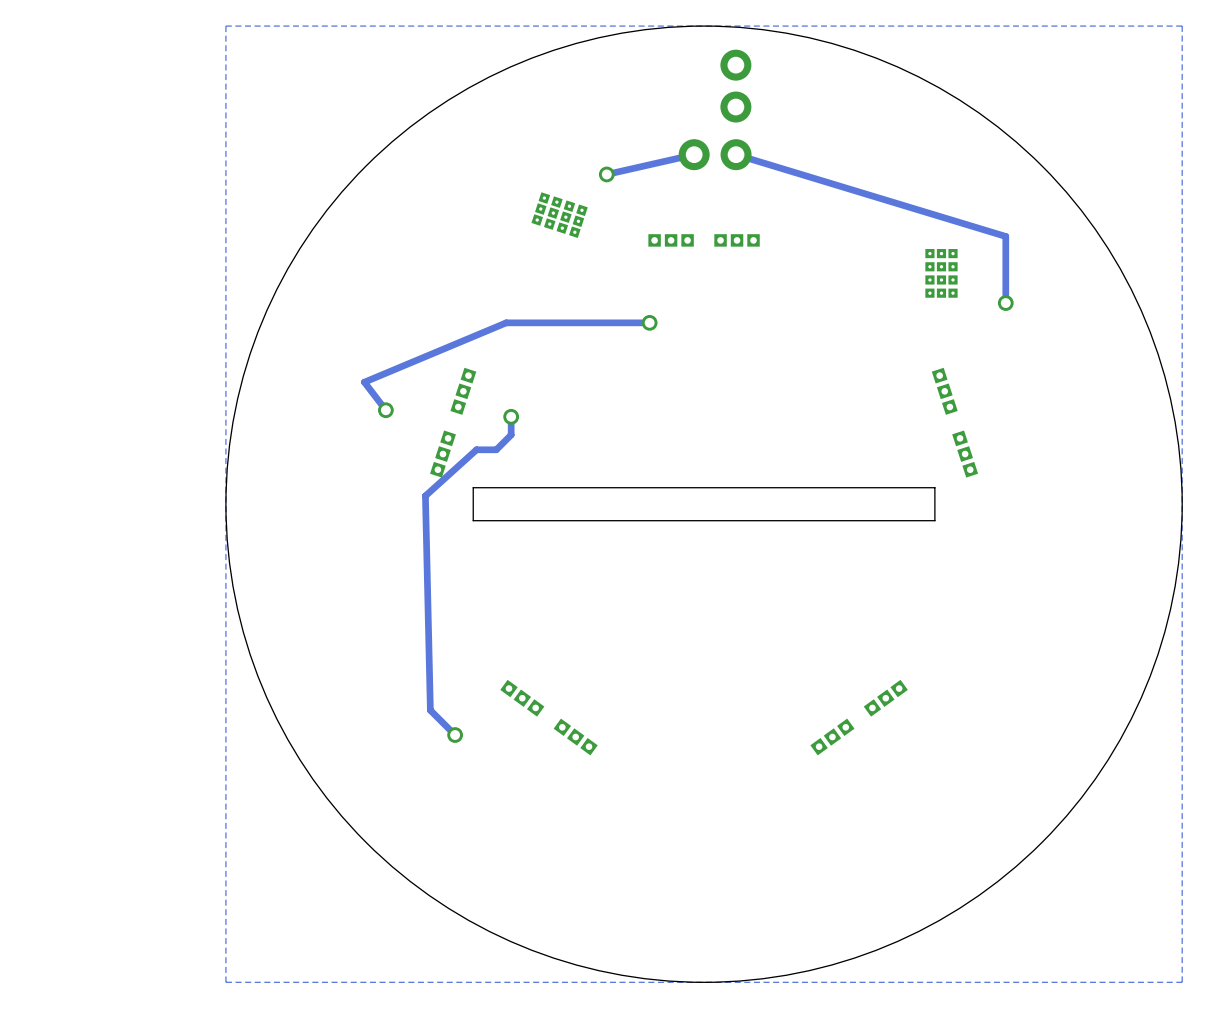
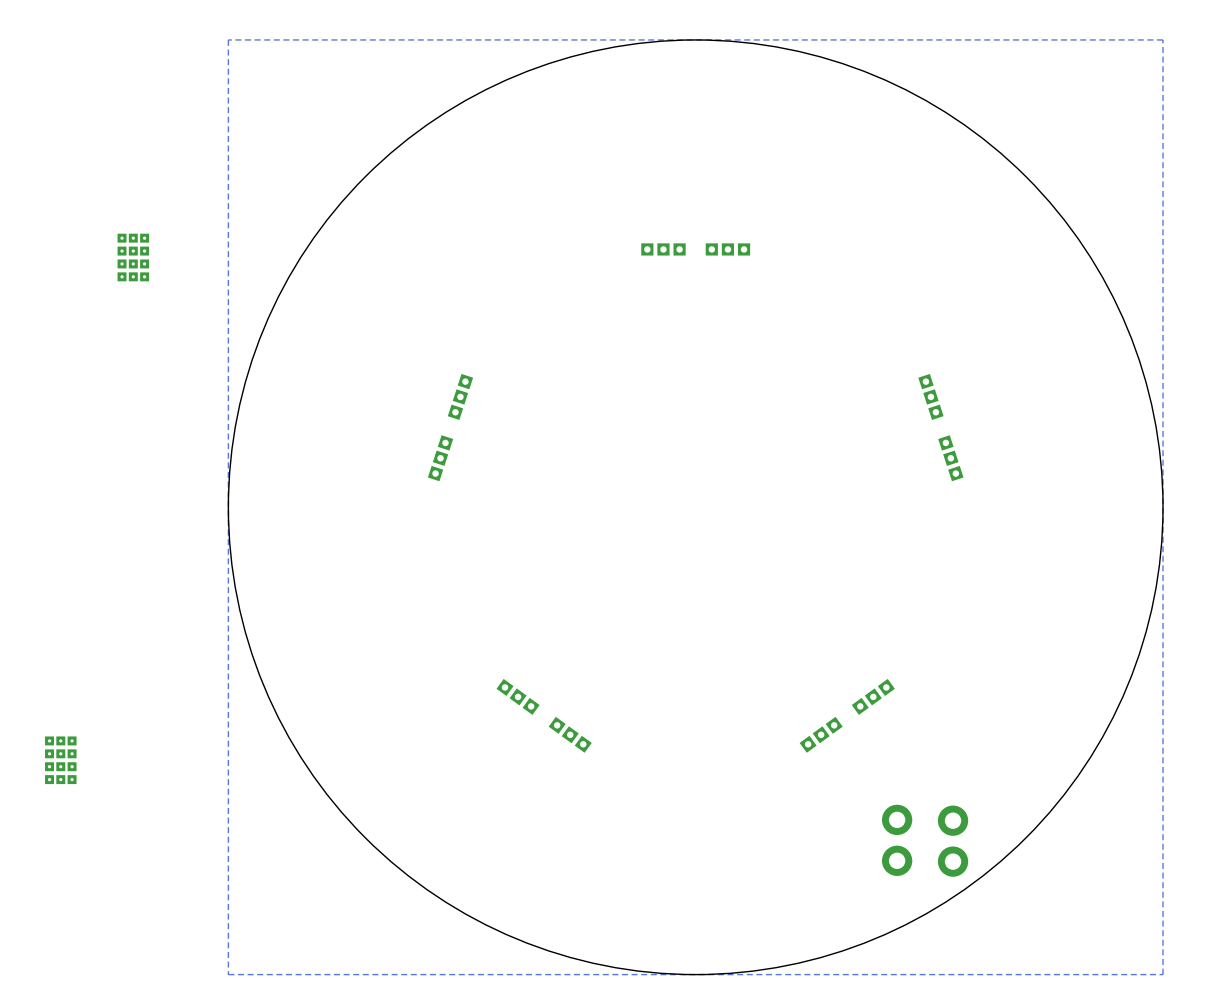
part: (735, 86) -> none
track: (694, 154) (606, 174) -> none
part: (715, 154) -> none
track: (736, 154) (1005, 236) (1005, 303) -> none
via: (606, 174) -> none
part: (559, 215) -> none
part: none -> (133, 257)
part: (941, 273) -> none
via: (1005, 303) -> none
track: (649, 322) (506, 322) (364, 382) (385, 410) -> none
via: (649, 322) -> none
via: (385, 410) -> none
track: (511, 416) (511, 434) (496, 449) (476, 449) (425, 495) (430, 710) (455, 735) -> none
via: (511, 416) -> none
board edge: (934, 487) (473, 487) (473, 520) (934, 520) (934, 487) -> none
via: (455, 735) -> none
part: none -> (60, 760)
part: none -> (897, 840)
part: none -> (953, 841)

